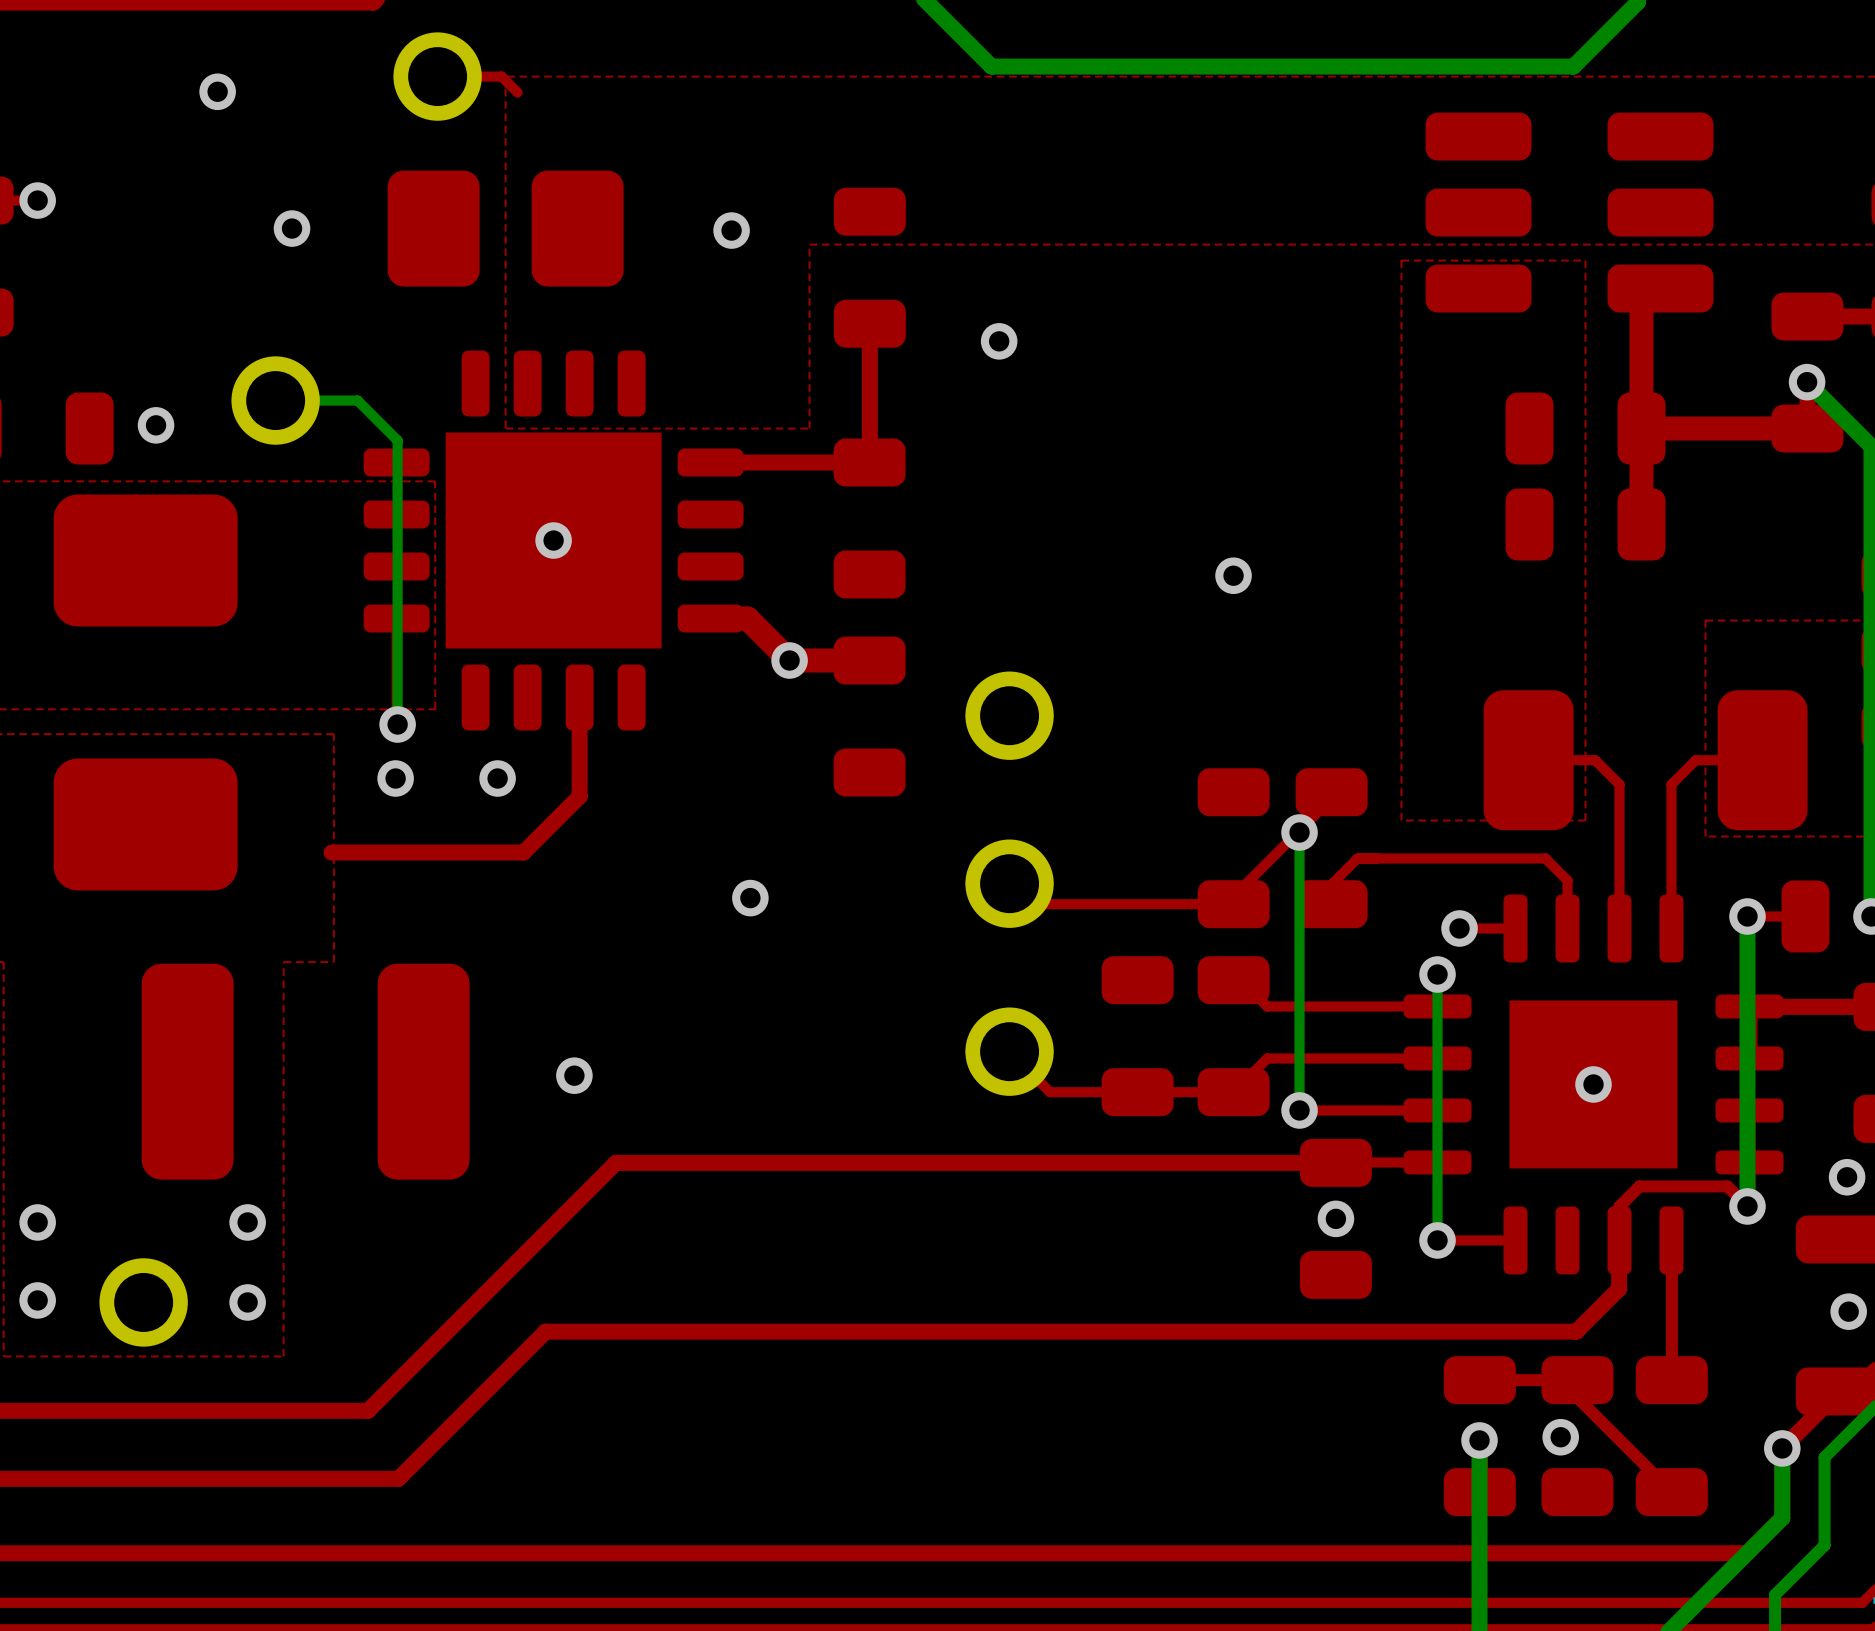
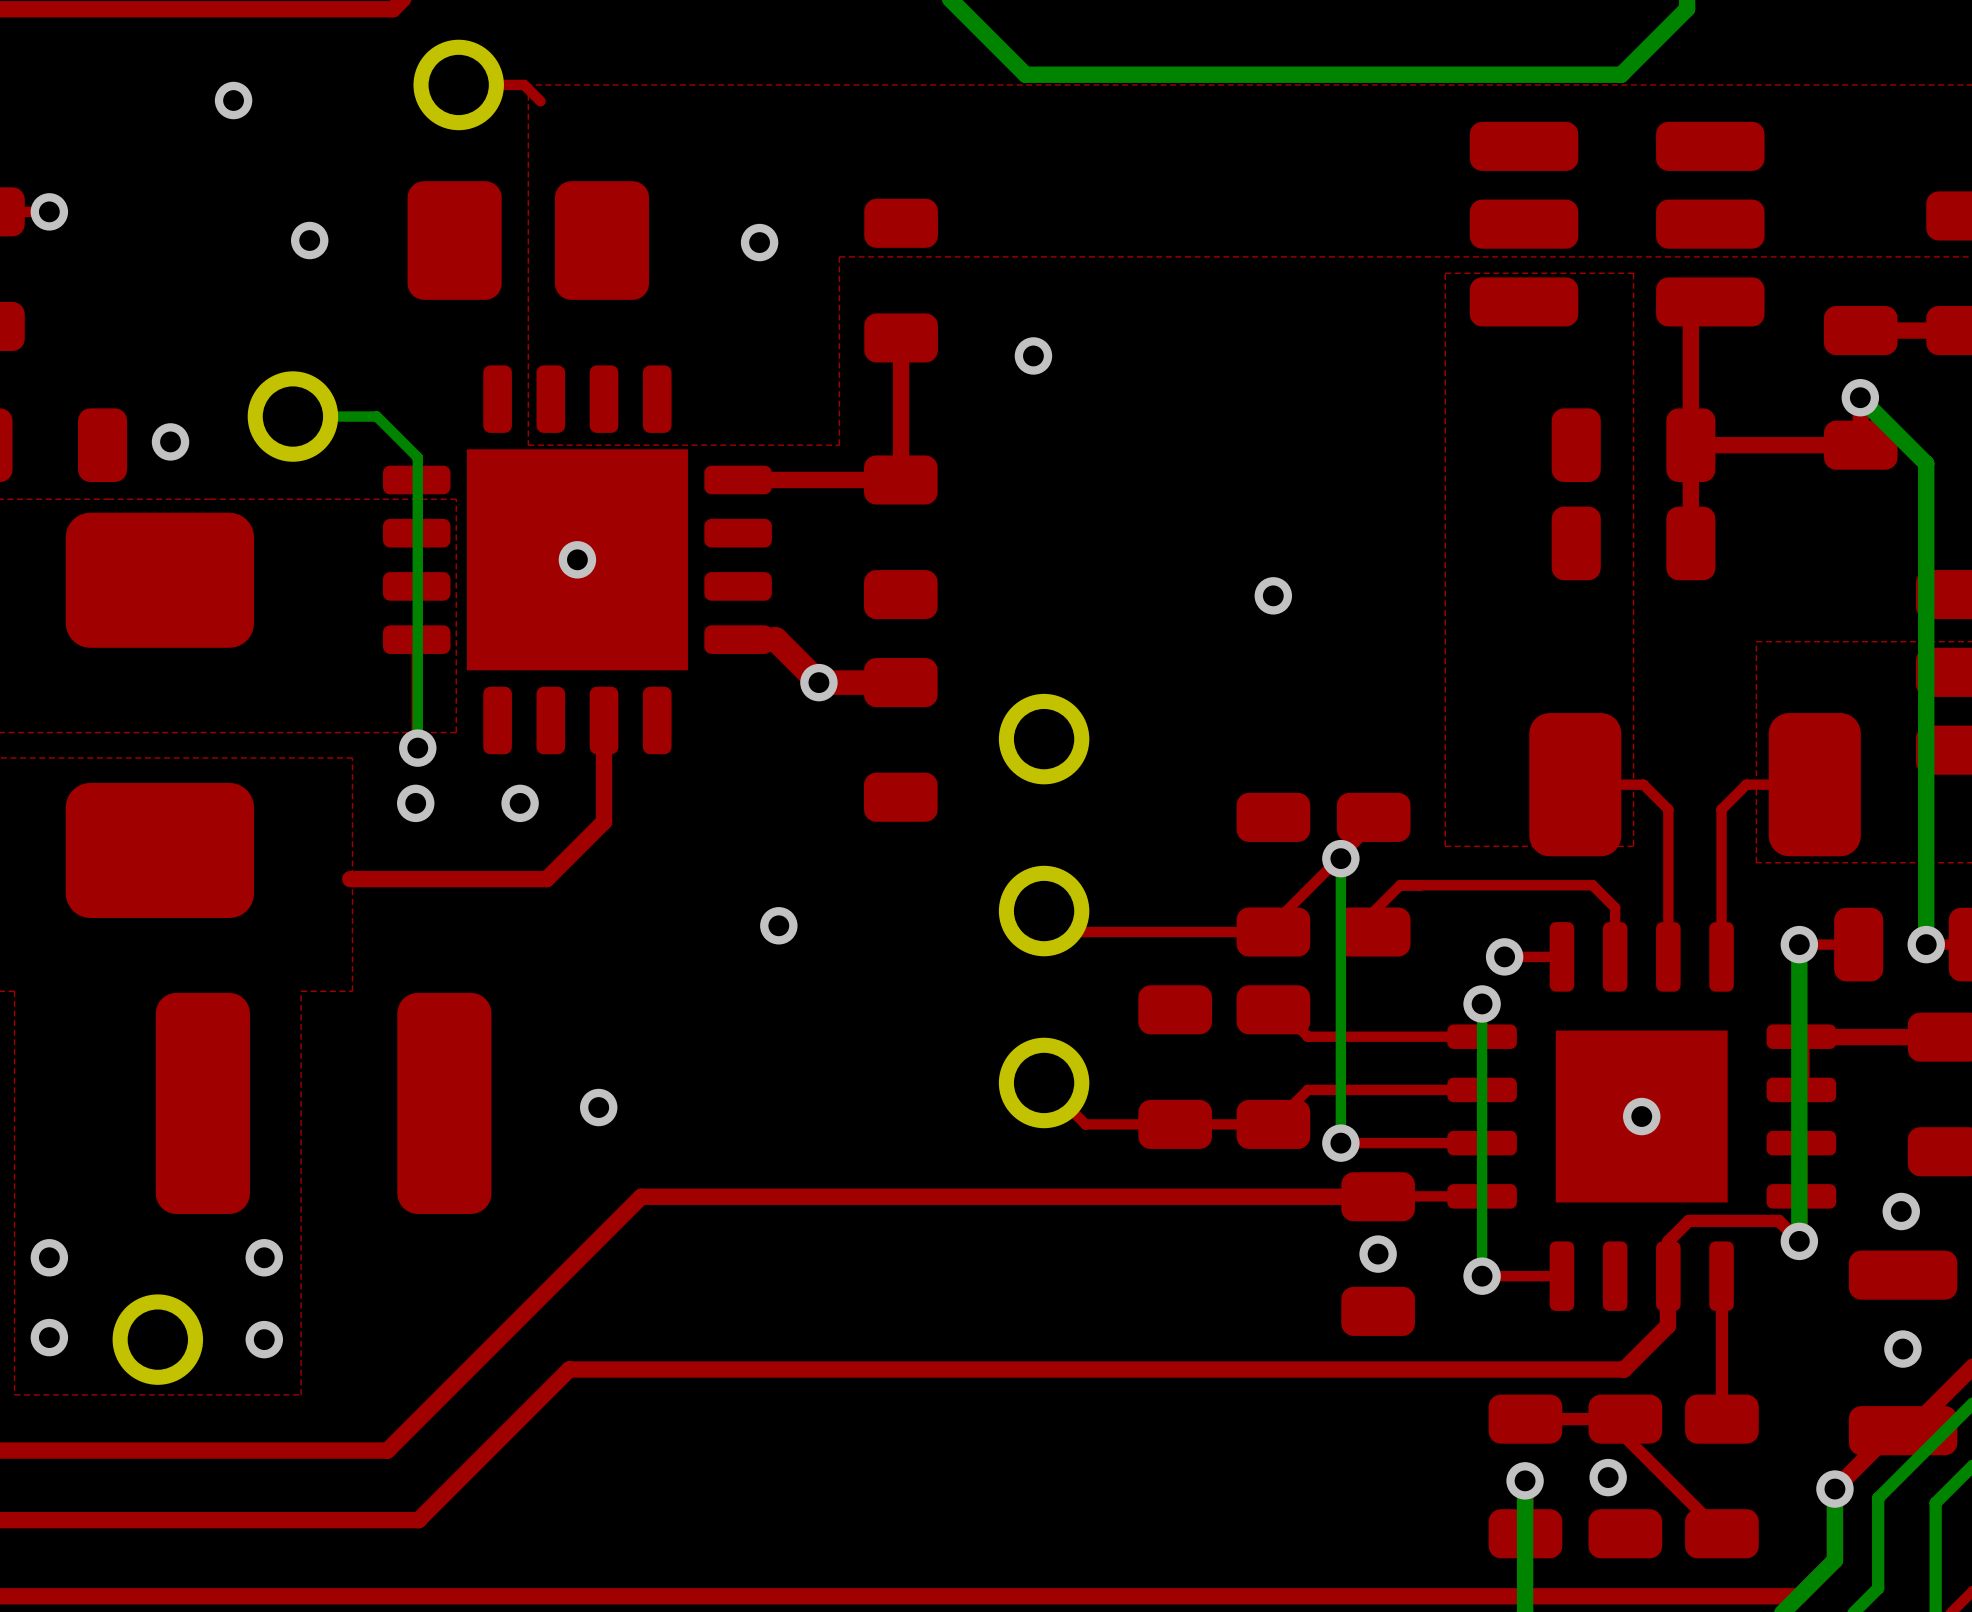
top track width: thick (1660, 288) (1641, 307) (1641, 524) -> thin (1710, 301) (1690, 321) (1690, 543)
top track width: thick (1807, 428) (1641, 428) -> thin (1860, 445) (1690, 445)

